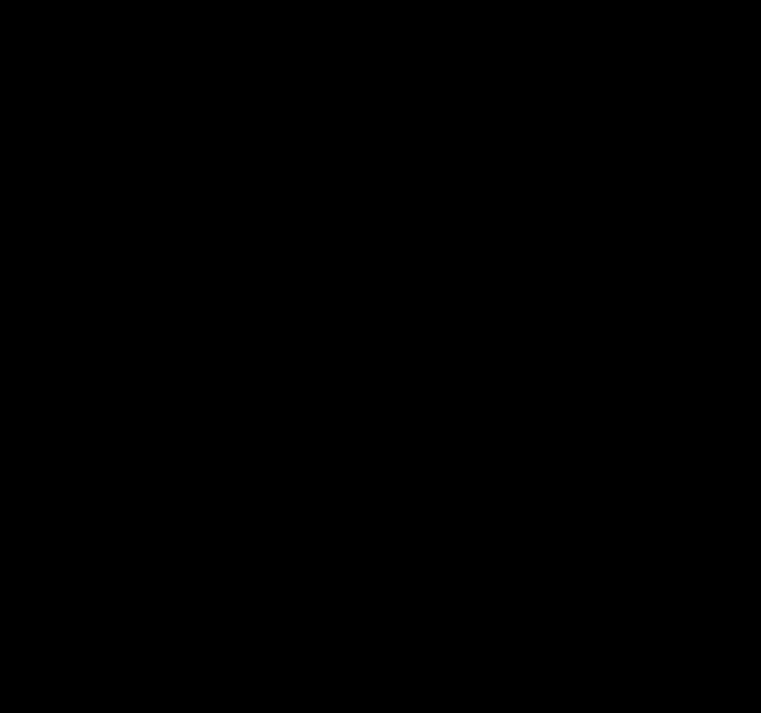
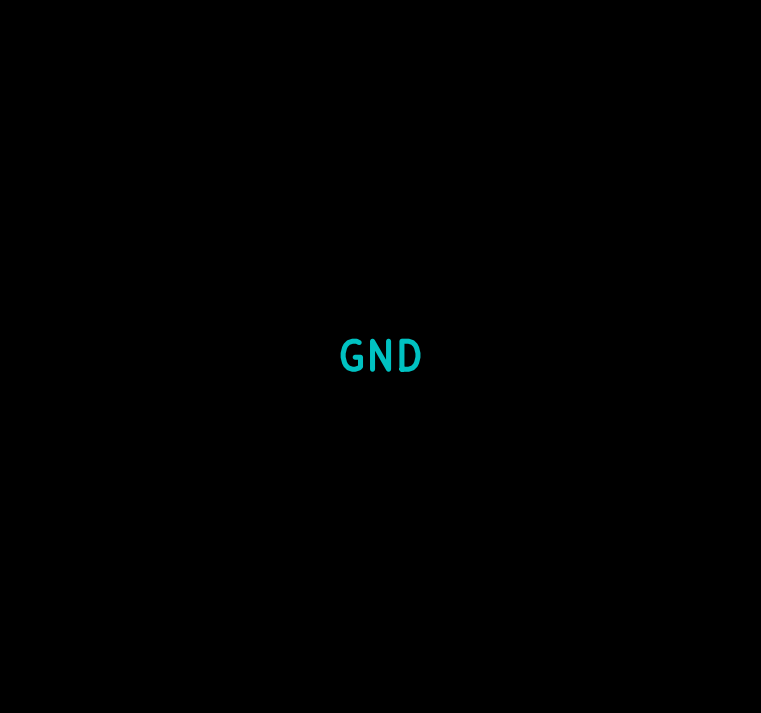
text: none -> GND (380, 355)

